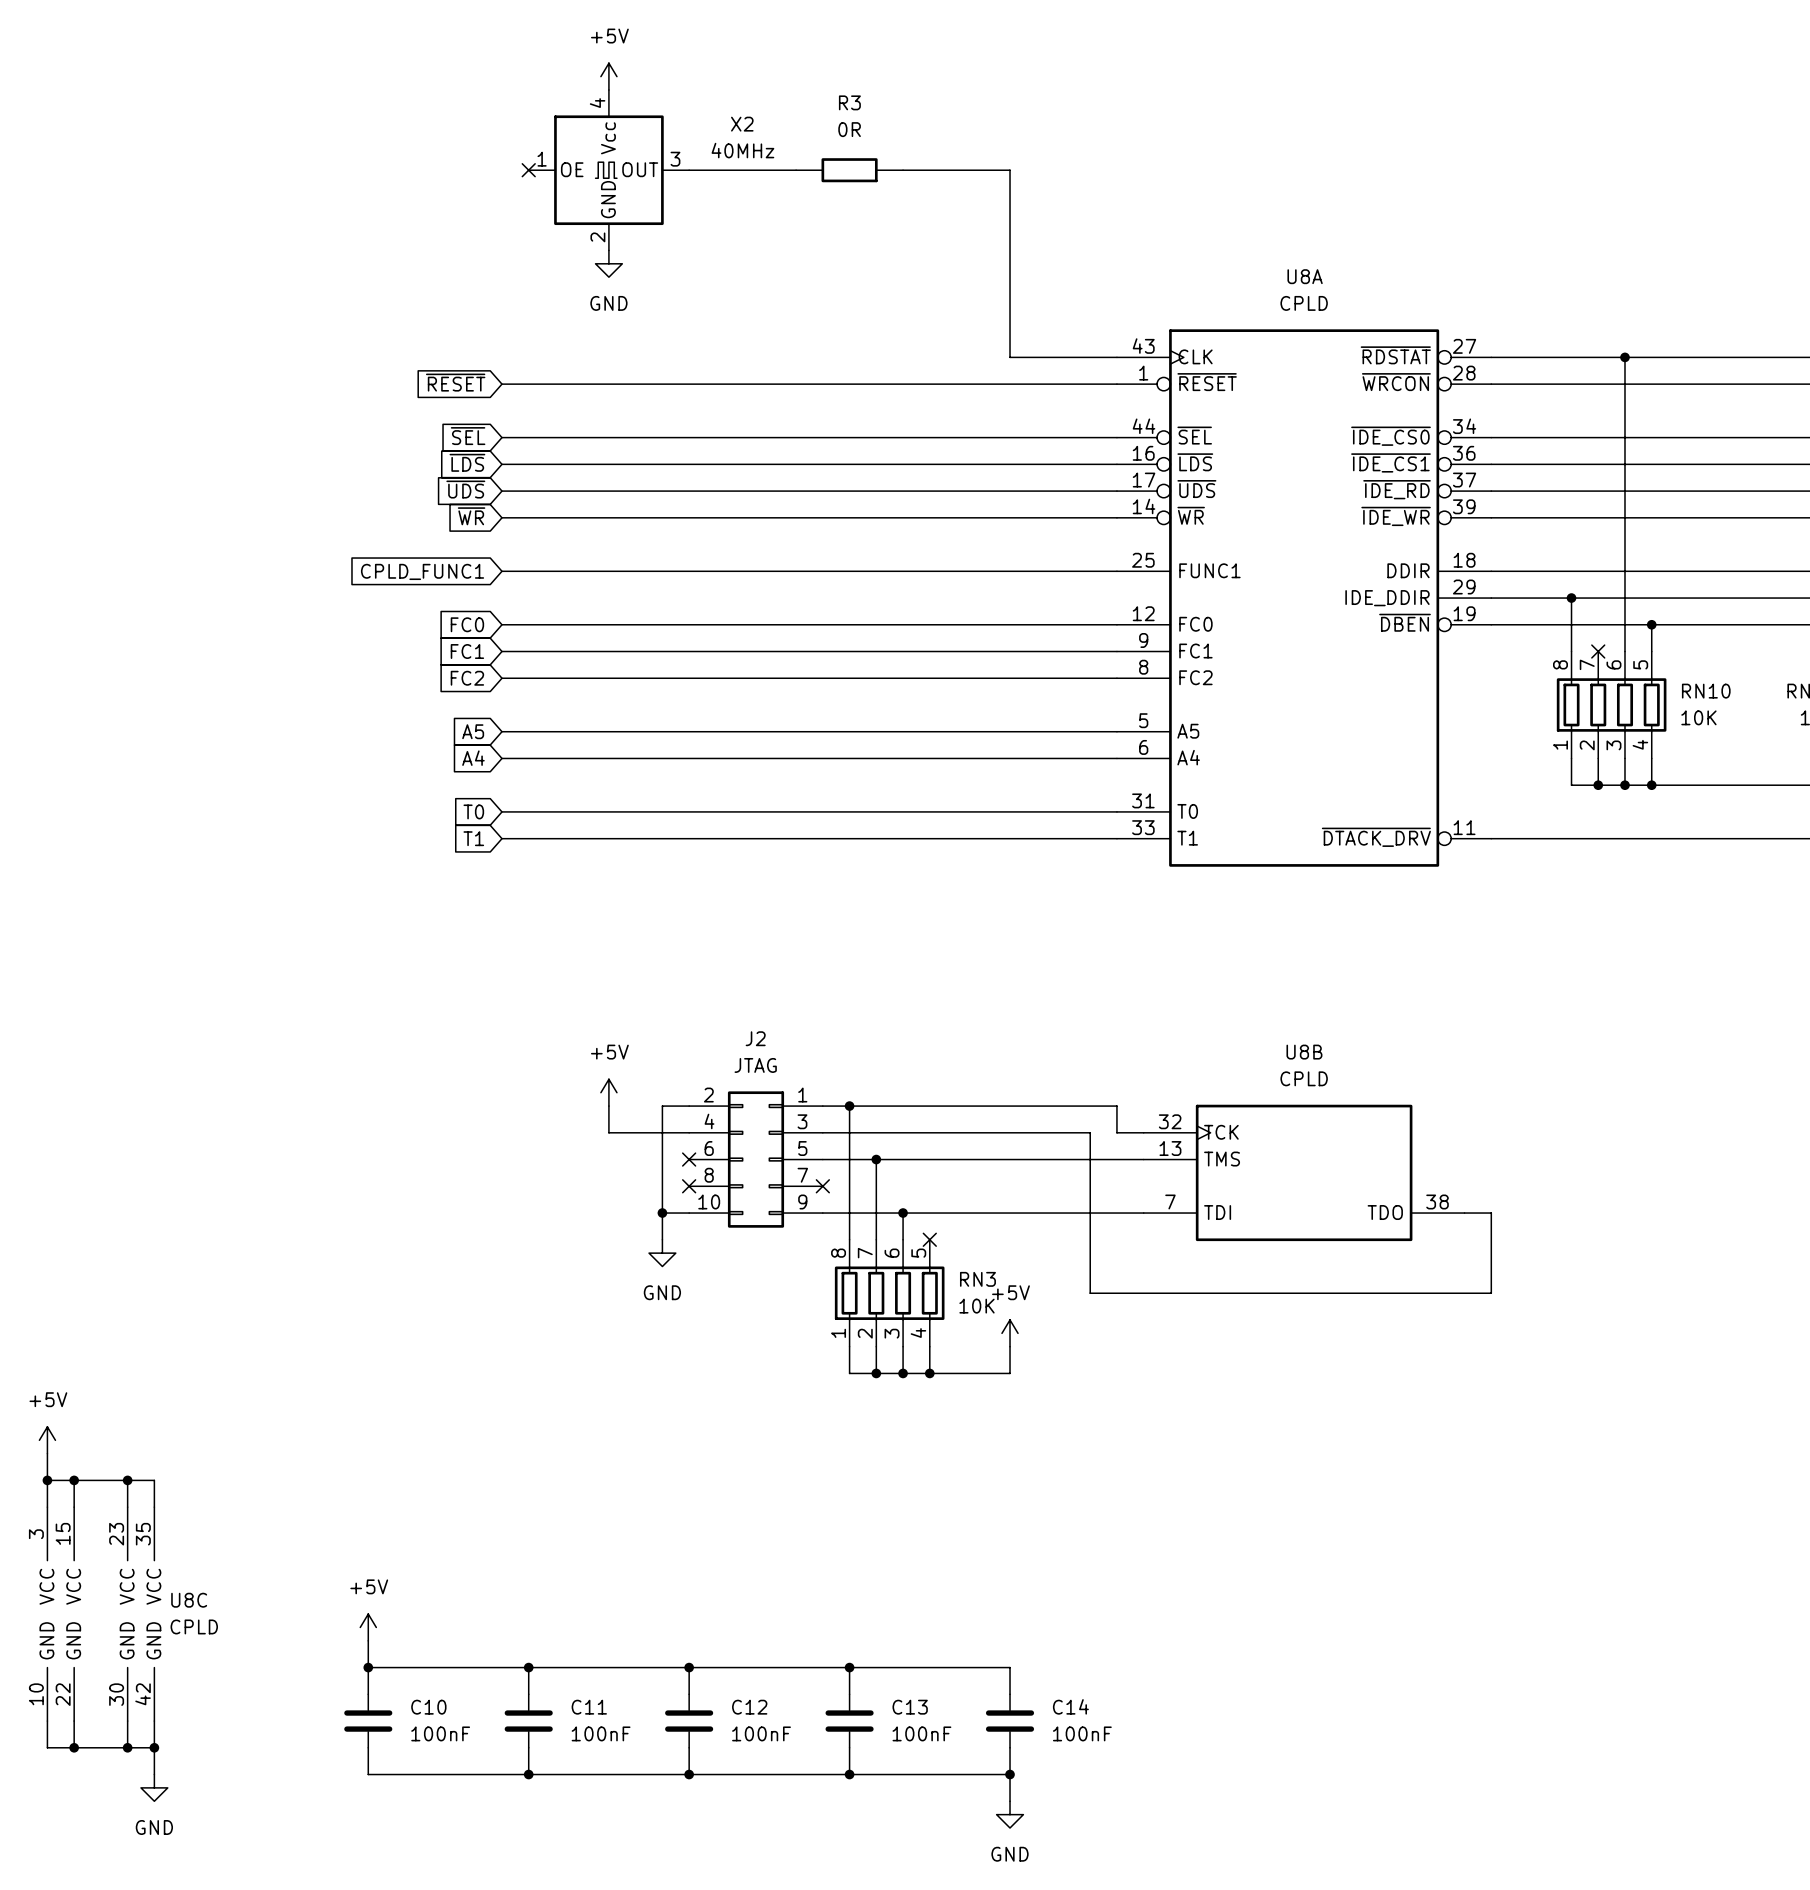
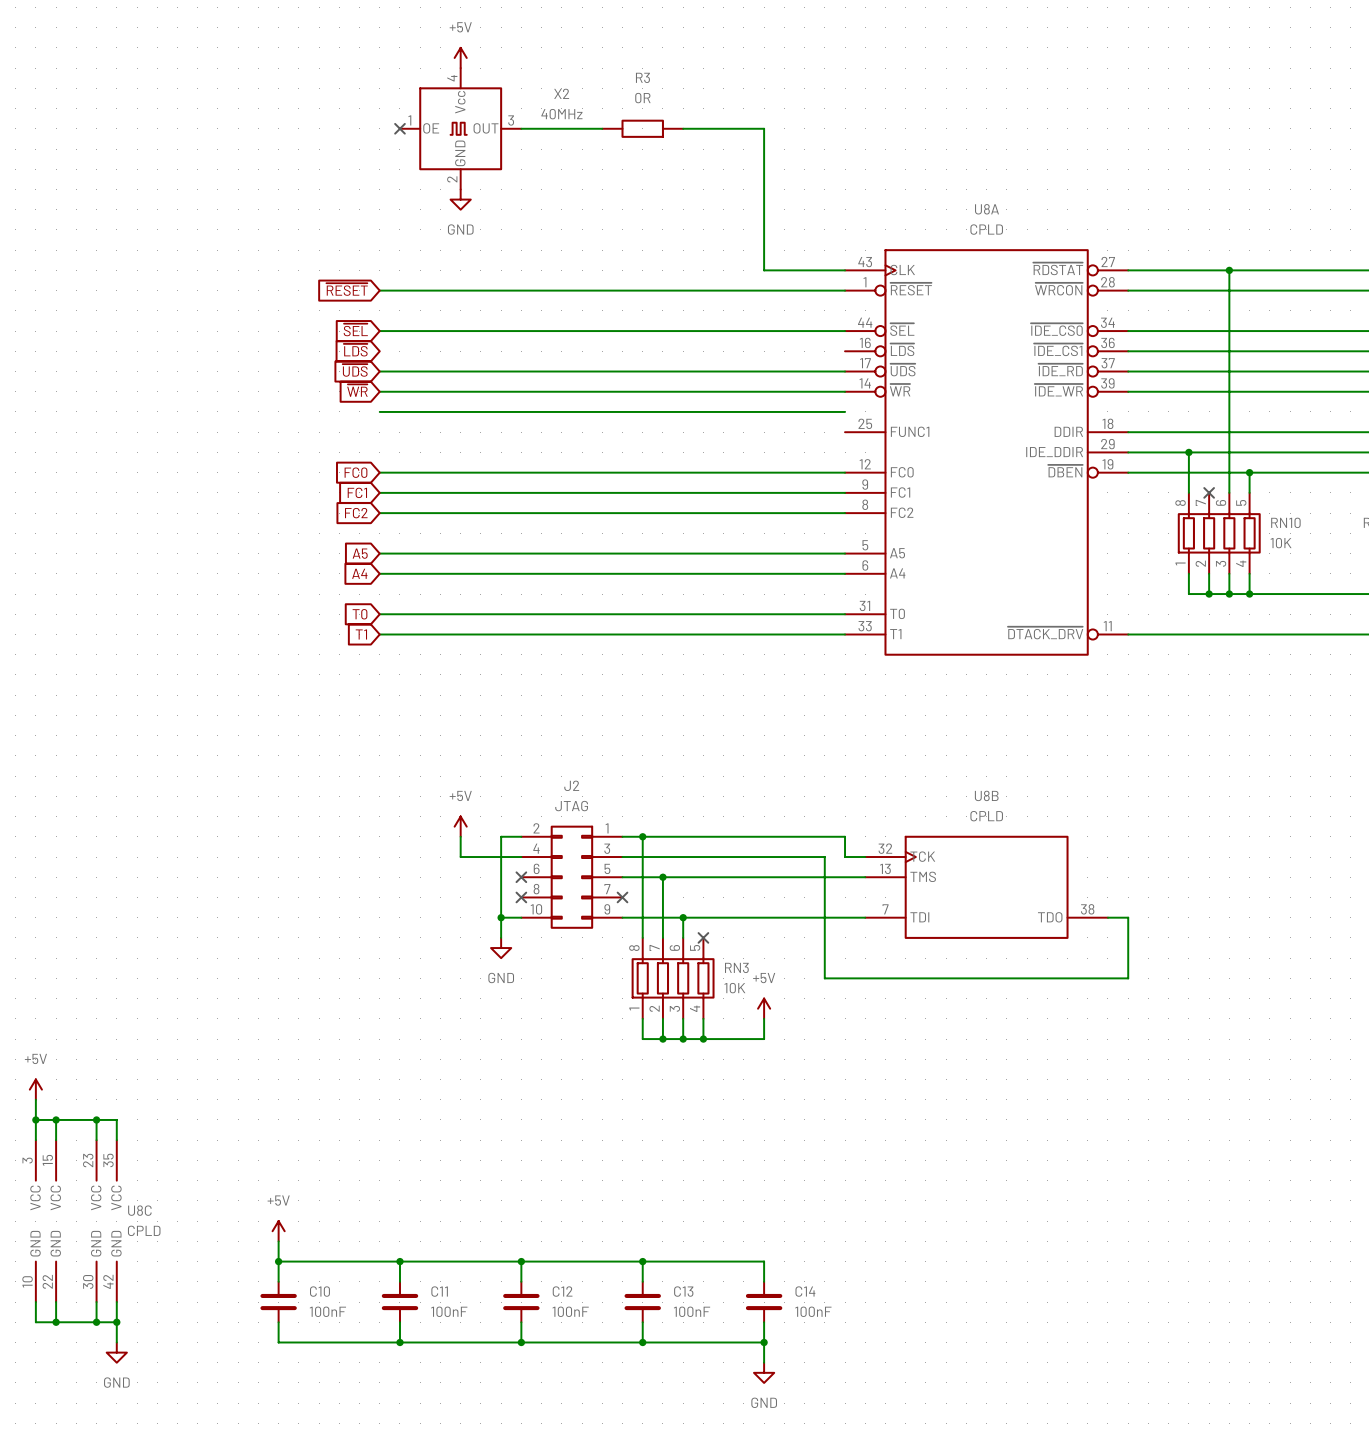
wire: (501, 464) (1116, 464) -> none
global label: CPLD_FUNC1 (422, 571) -> none
wire: (501, 571) (1116, 571) -> (379, 411) (845, 411)

